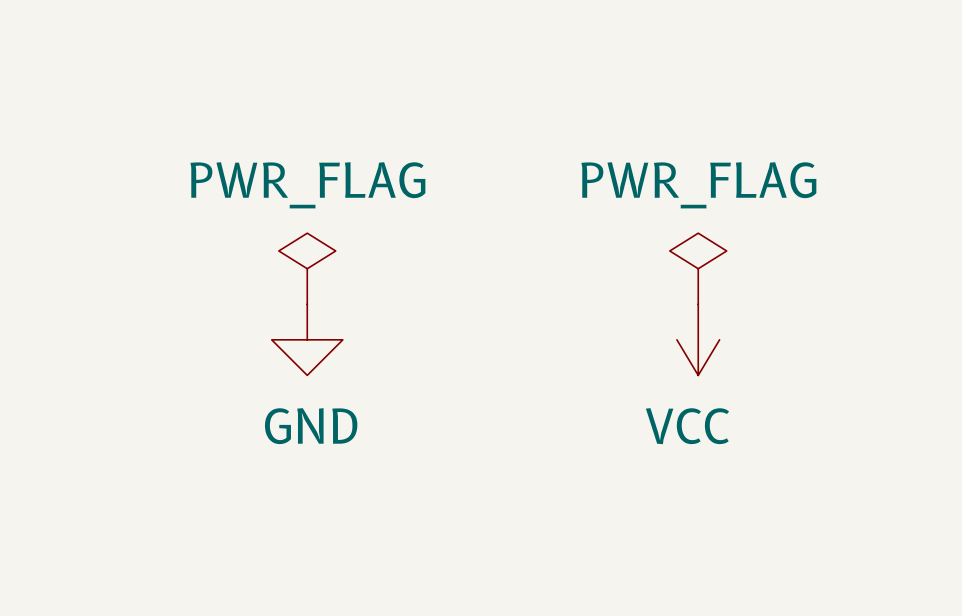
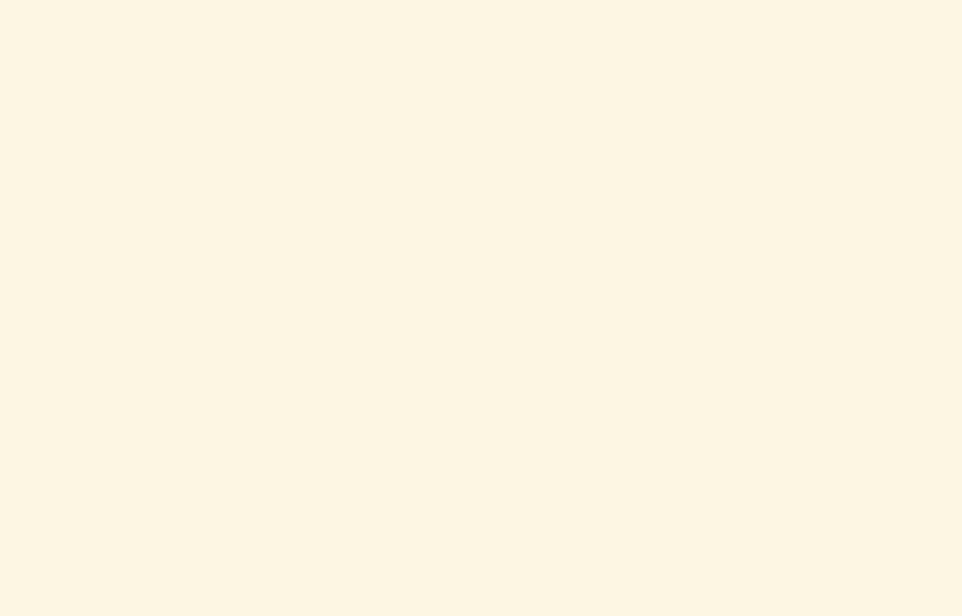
power symbol: PWR_FLAG (307, 268) -> none
power symbol: PWR_FLAG (698, 268) -> none
power symbol: GND (307, 339) -> none
power symbol: VCC (698, 339) -> none

